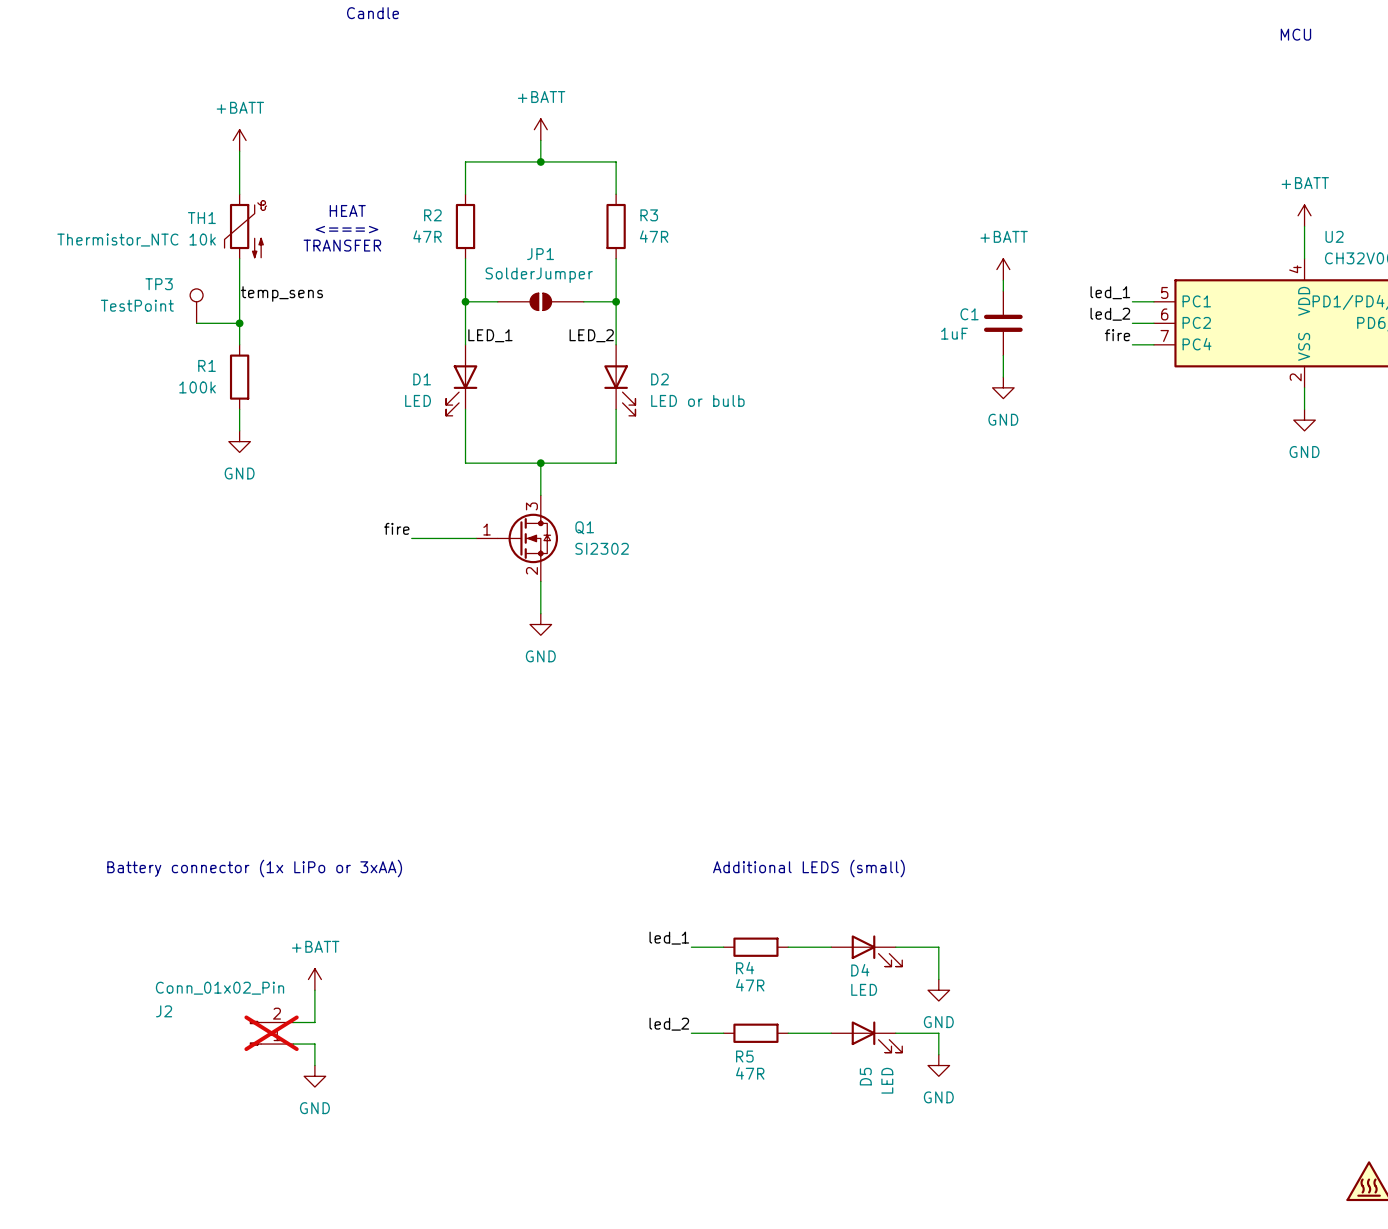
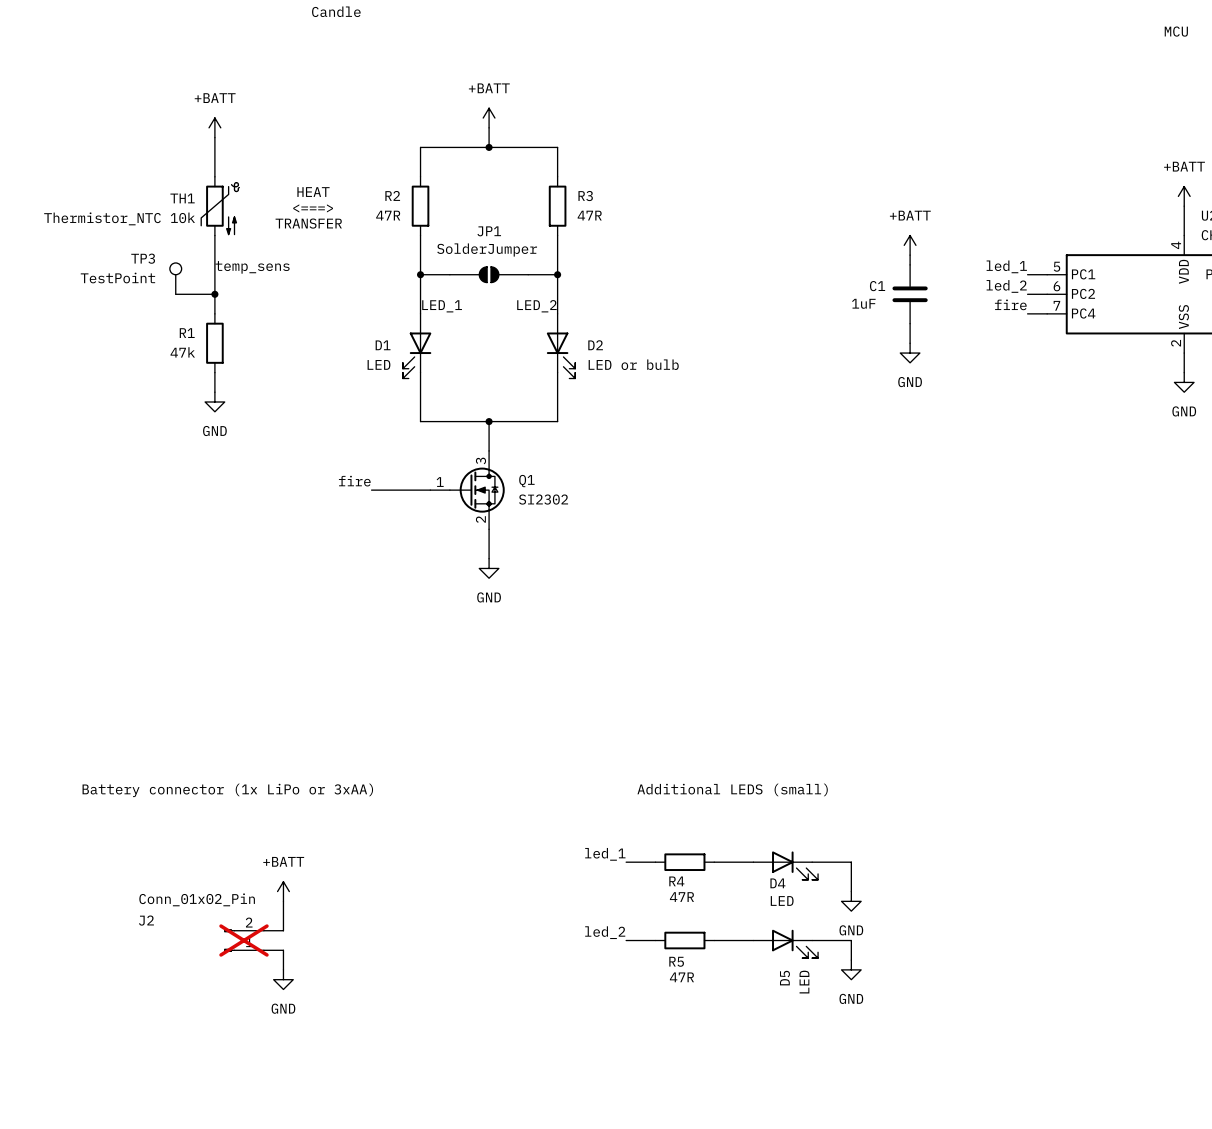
R1 value: 100k (197, 387) -> 47k (182, 352)

